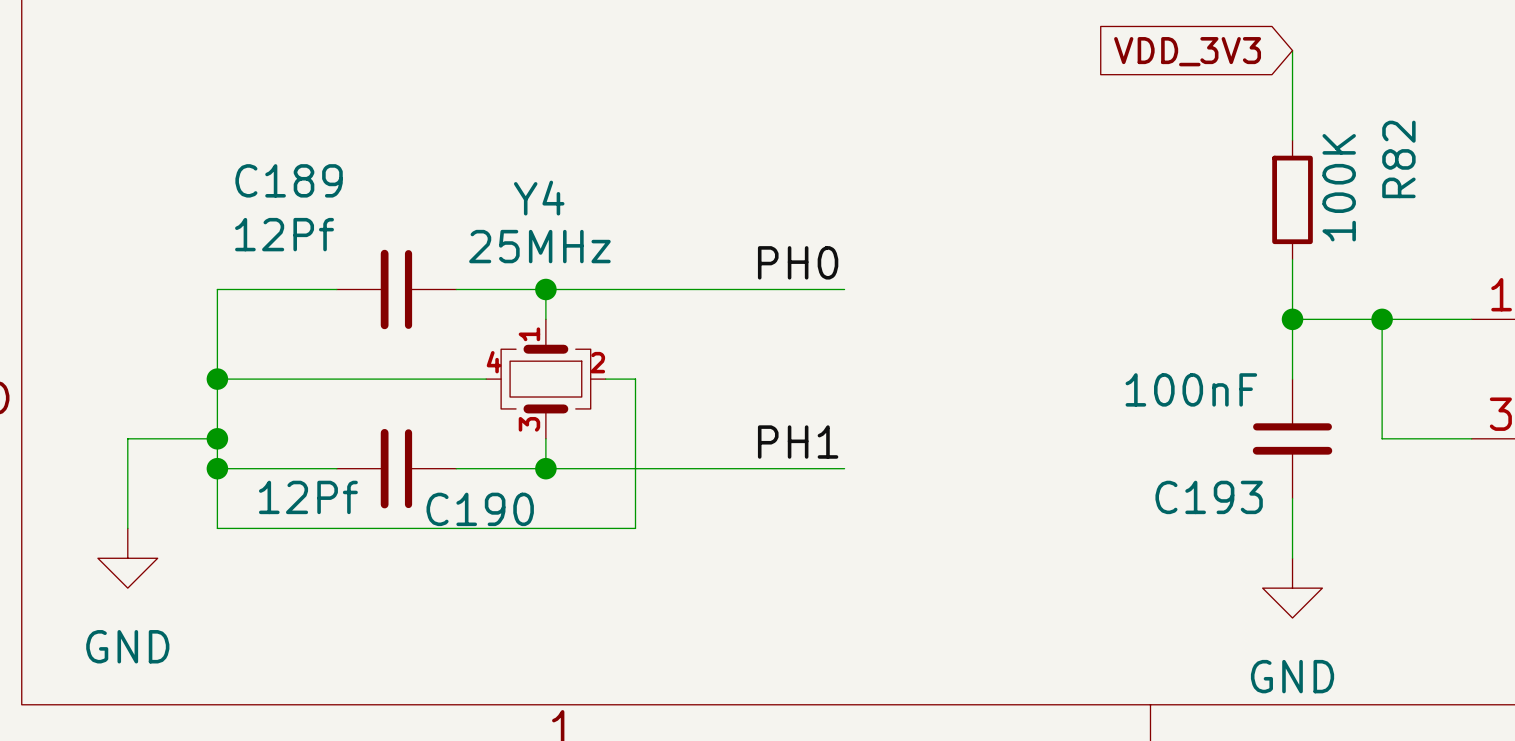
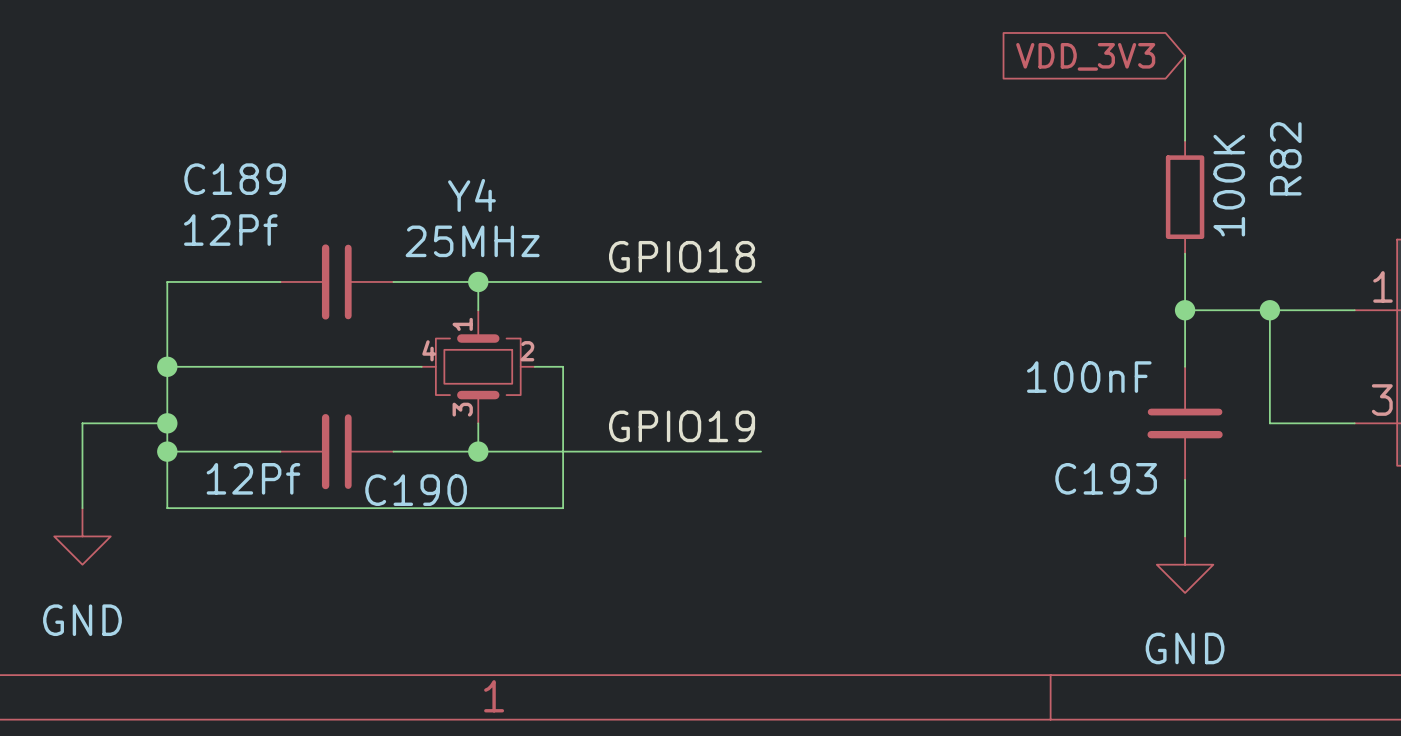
label: PH0 (798, 262) -> GPIO18 (682, 256)
label: PH1 (798, 442) -> GPIO19 (682, 426)

